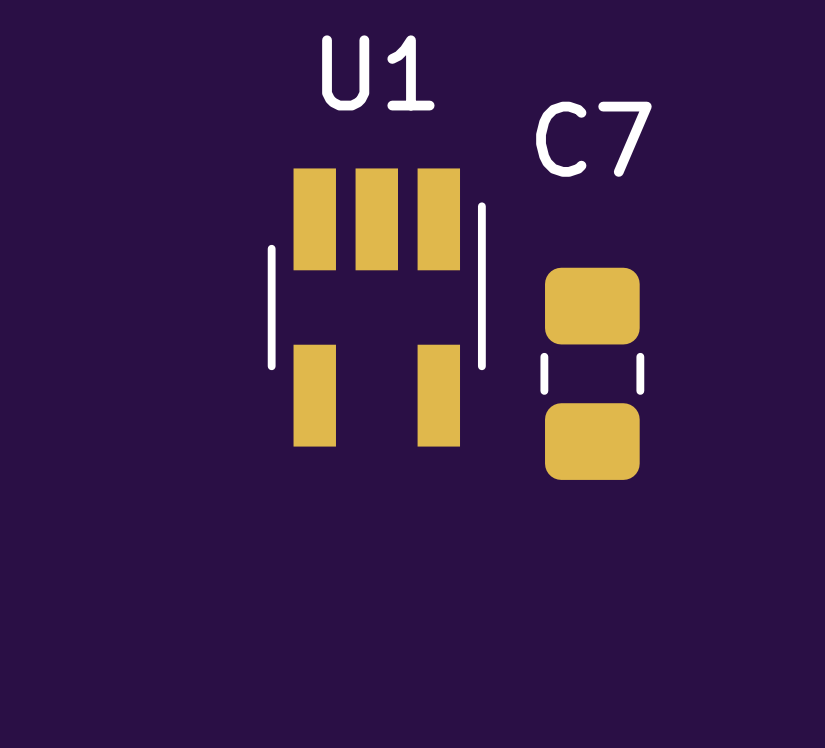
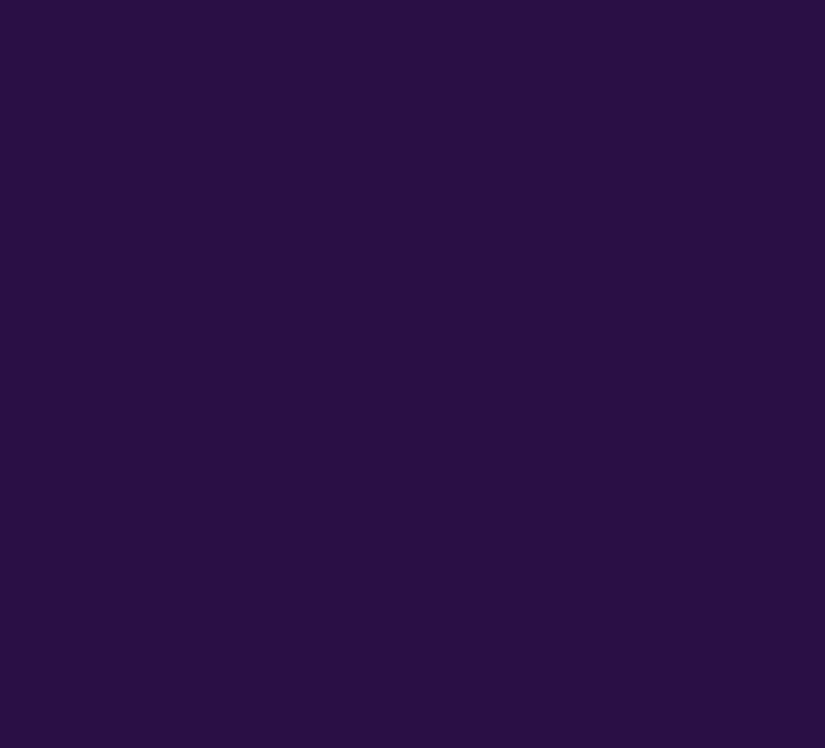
U1: (376, 307) -> none
C7: (592, 373) -> none

